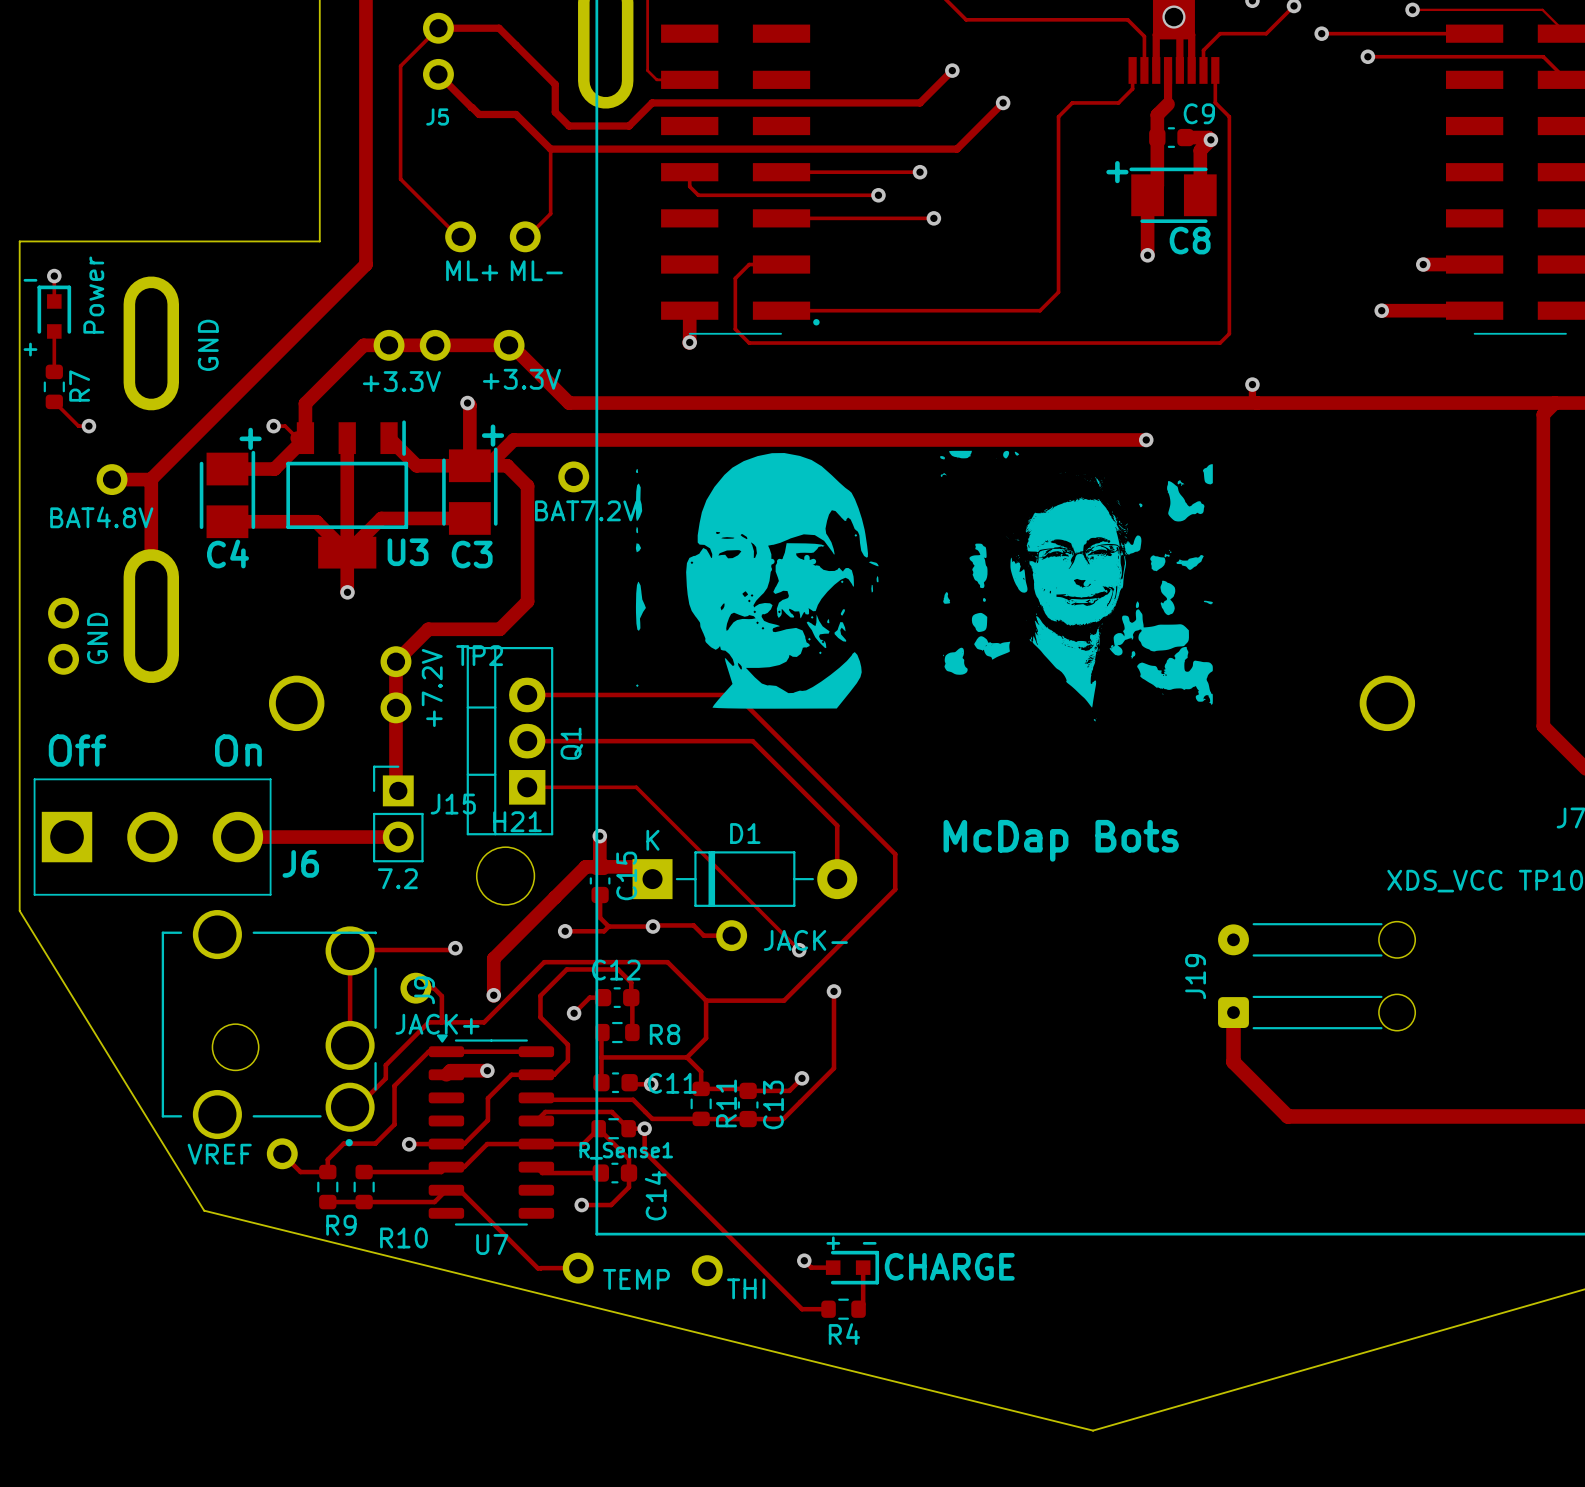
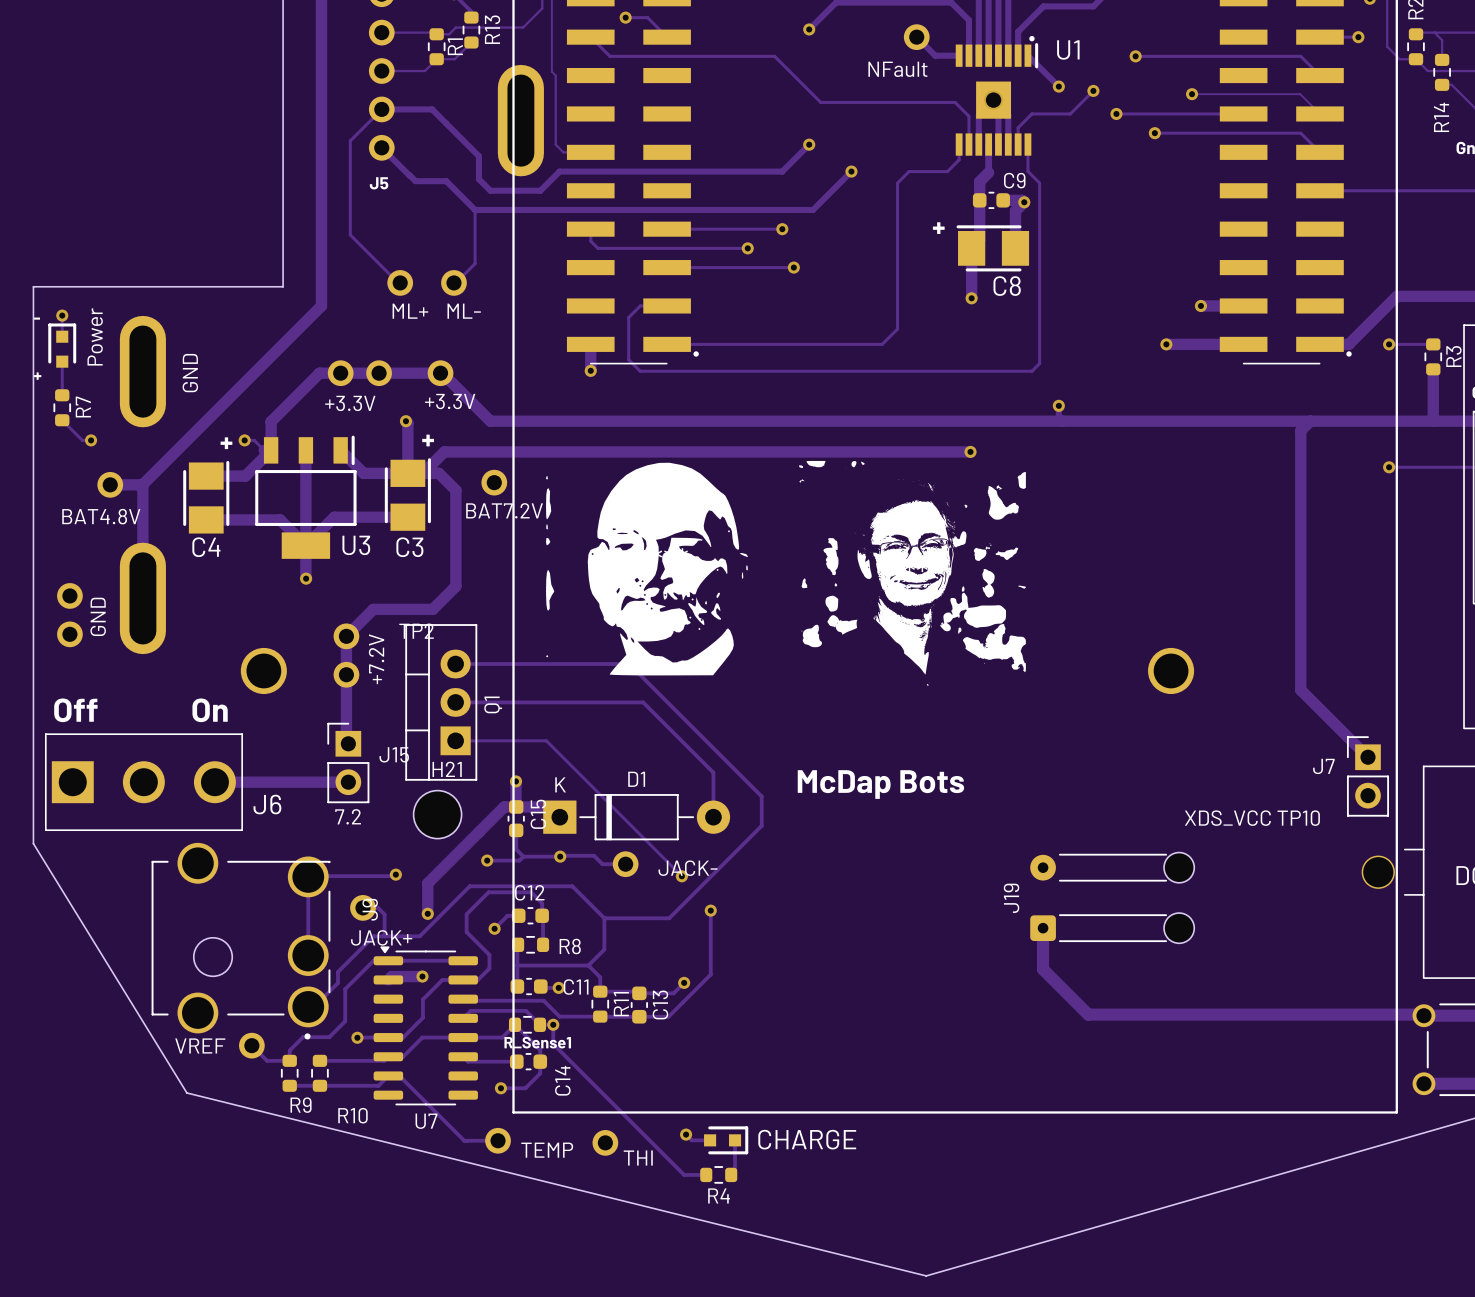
text: + (833, 1243) -> none
text: - (869, 1243) -> none

